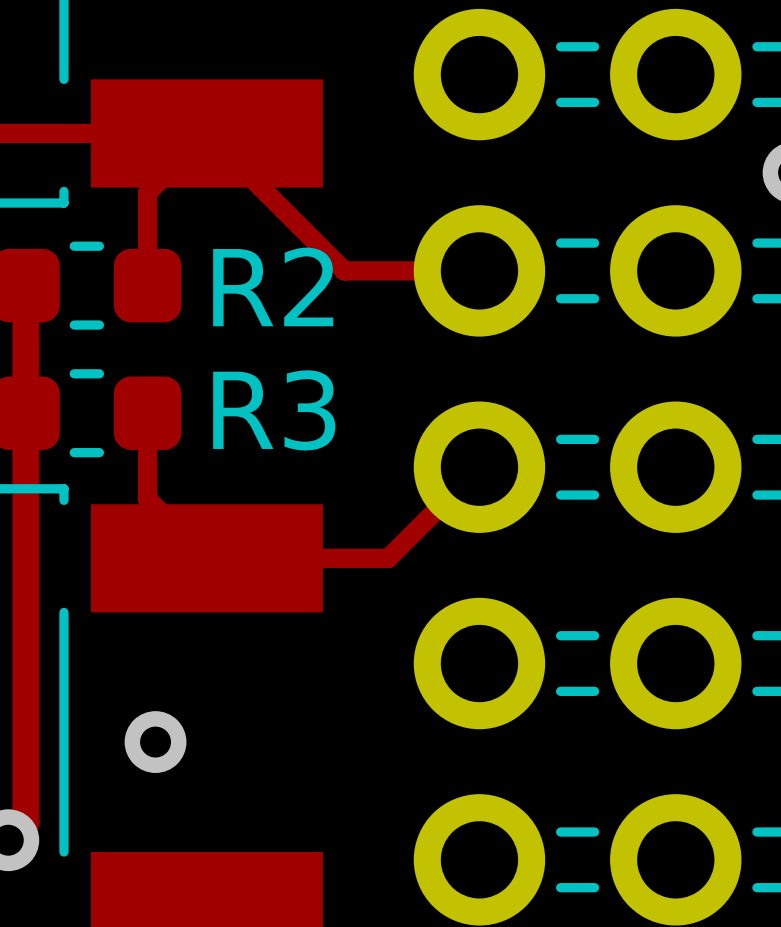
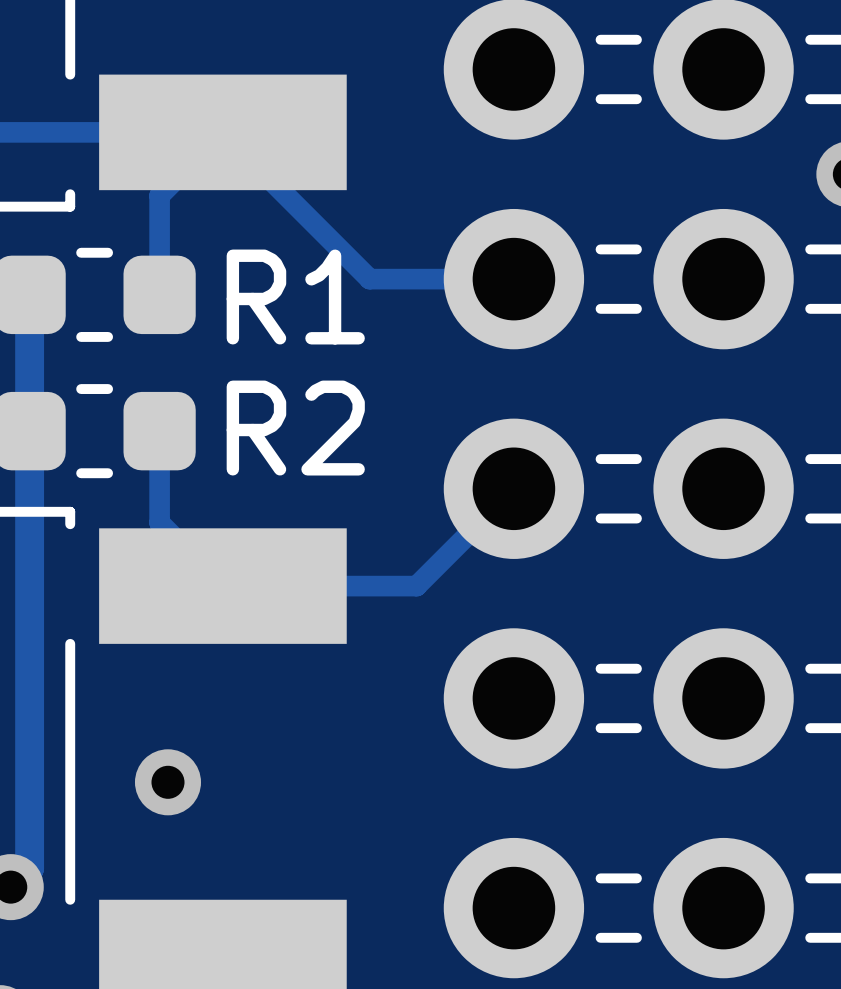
R2 name: R2 (273, 286) -> R1 (295, 297)
R3 name: R3 (274, 410) -> R2 (295, 428)

